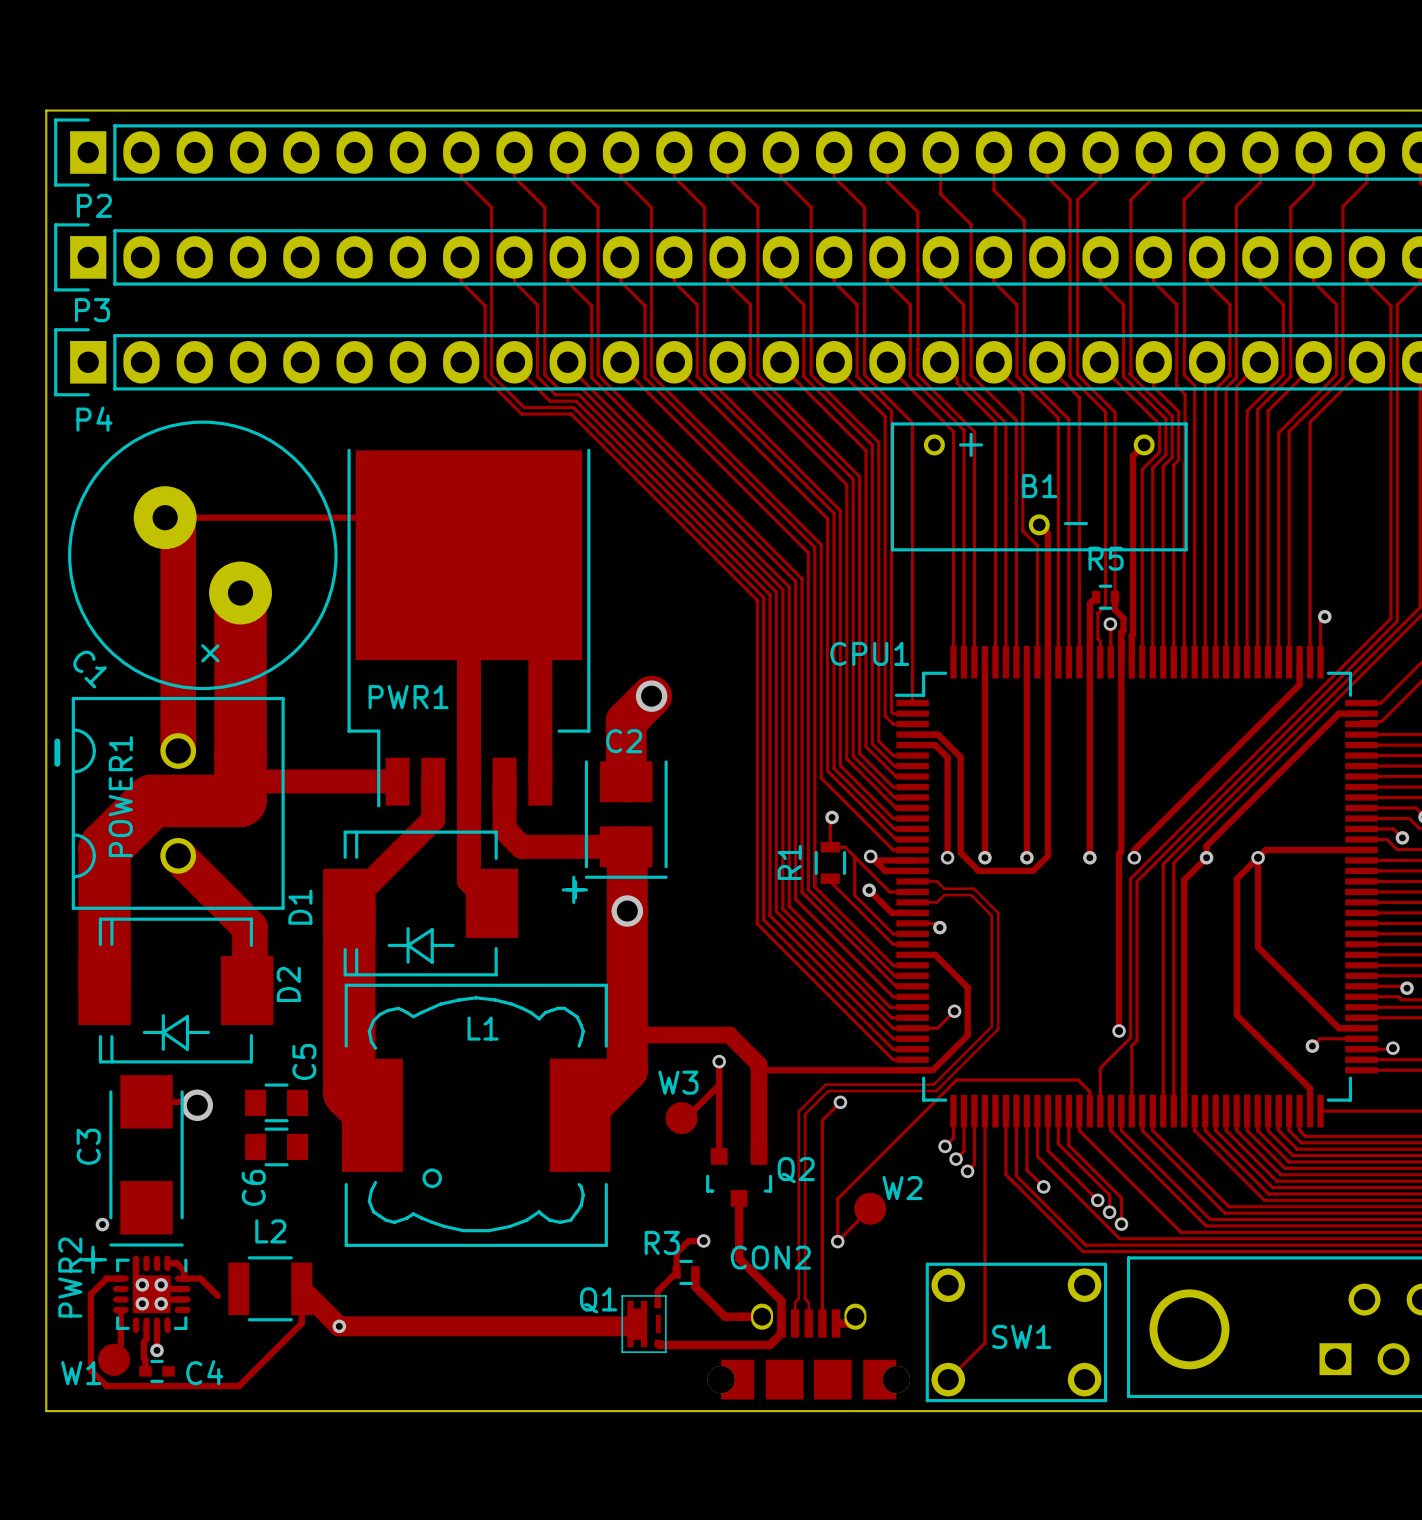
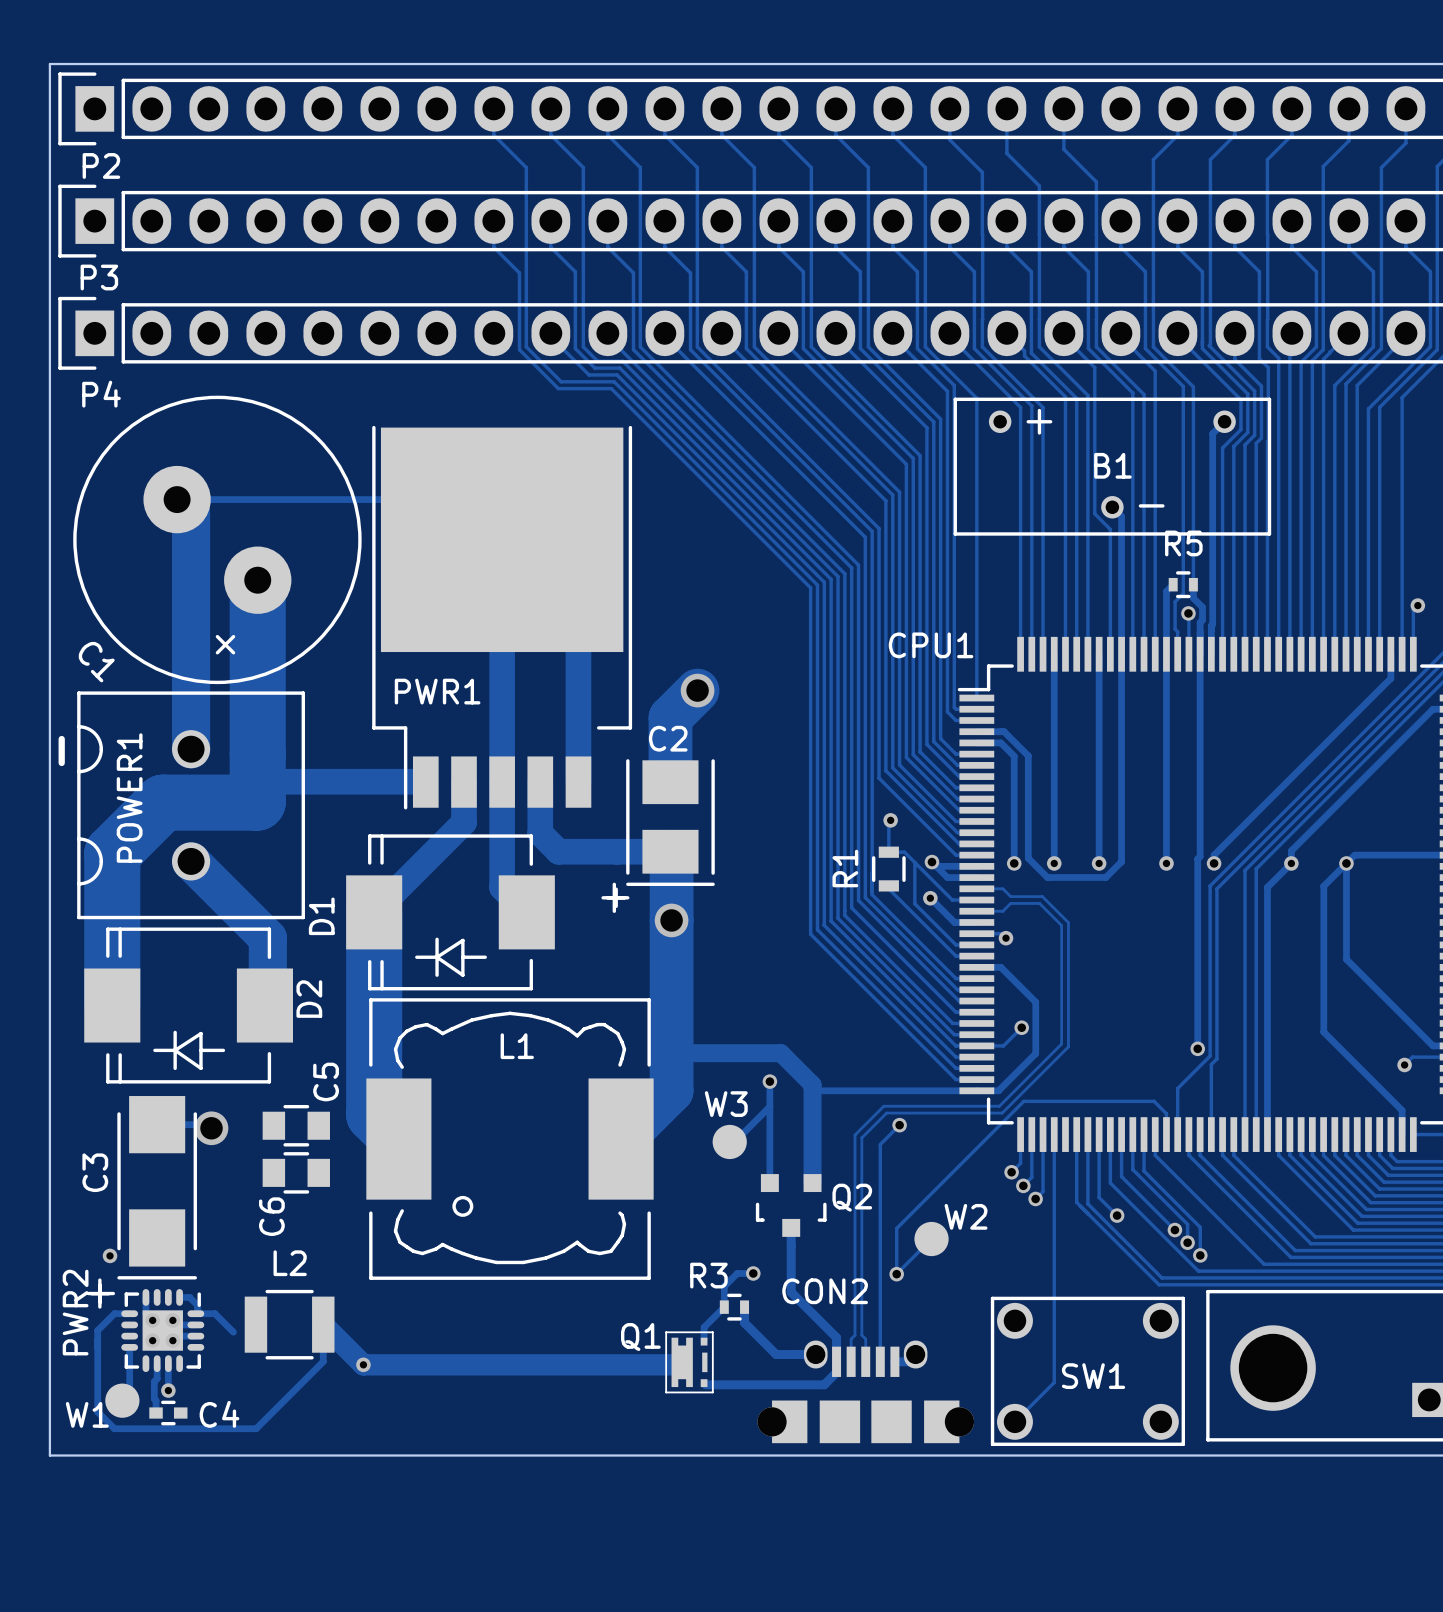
track: (1047, 152) (1047, 177) (1070, 199) (1070, 304) -> (1120, 221) (1120, 247) (1145, 271)

